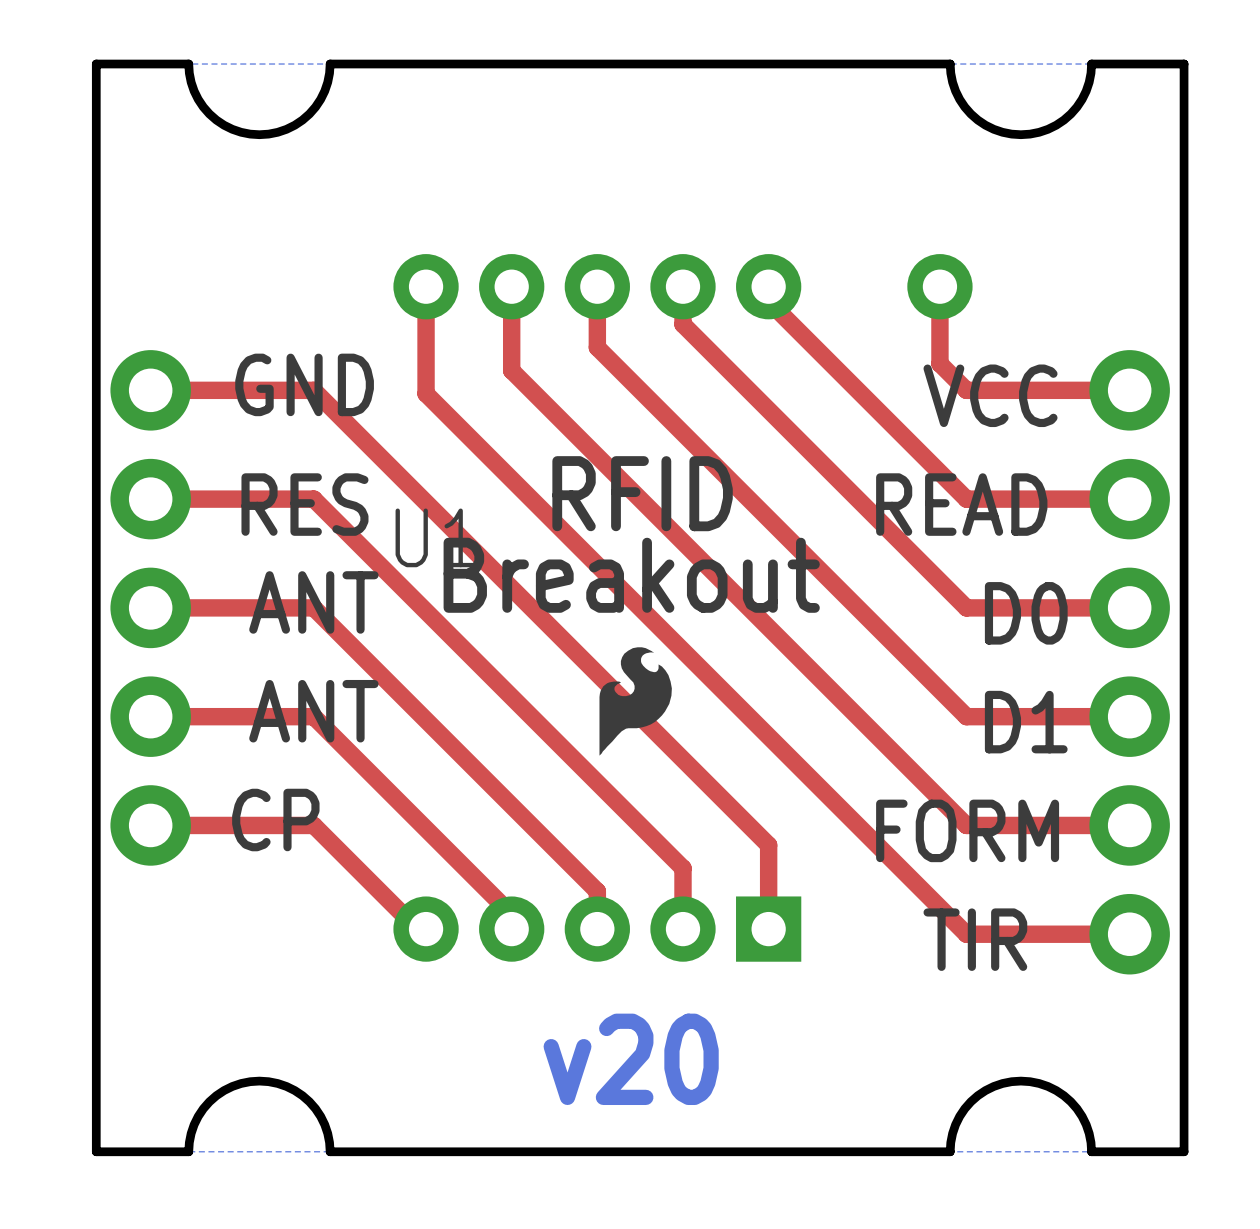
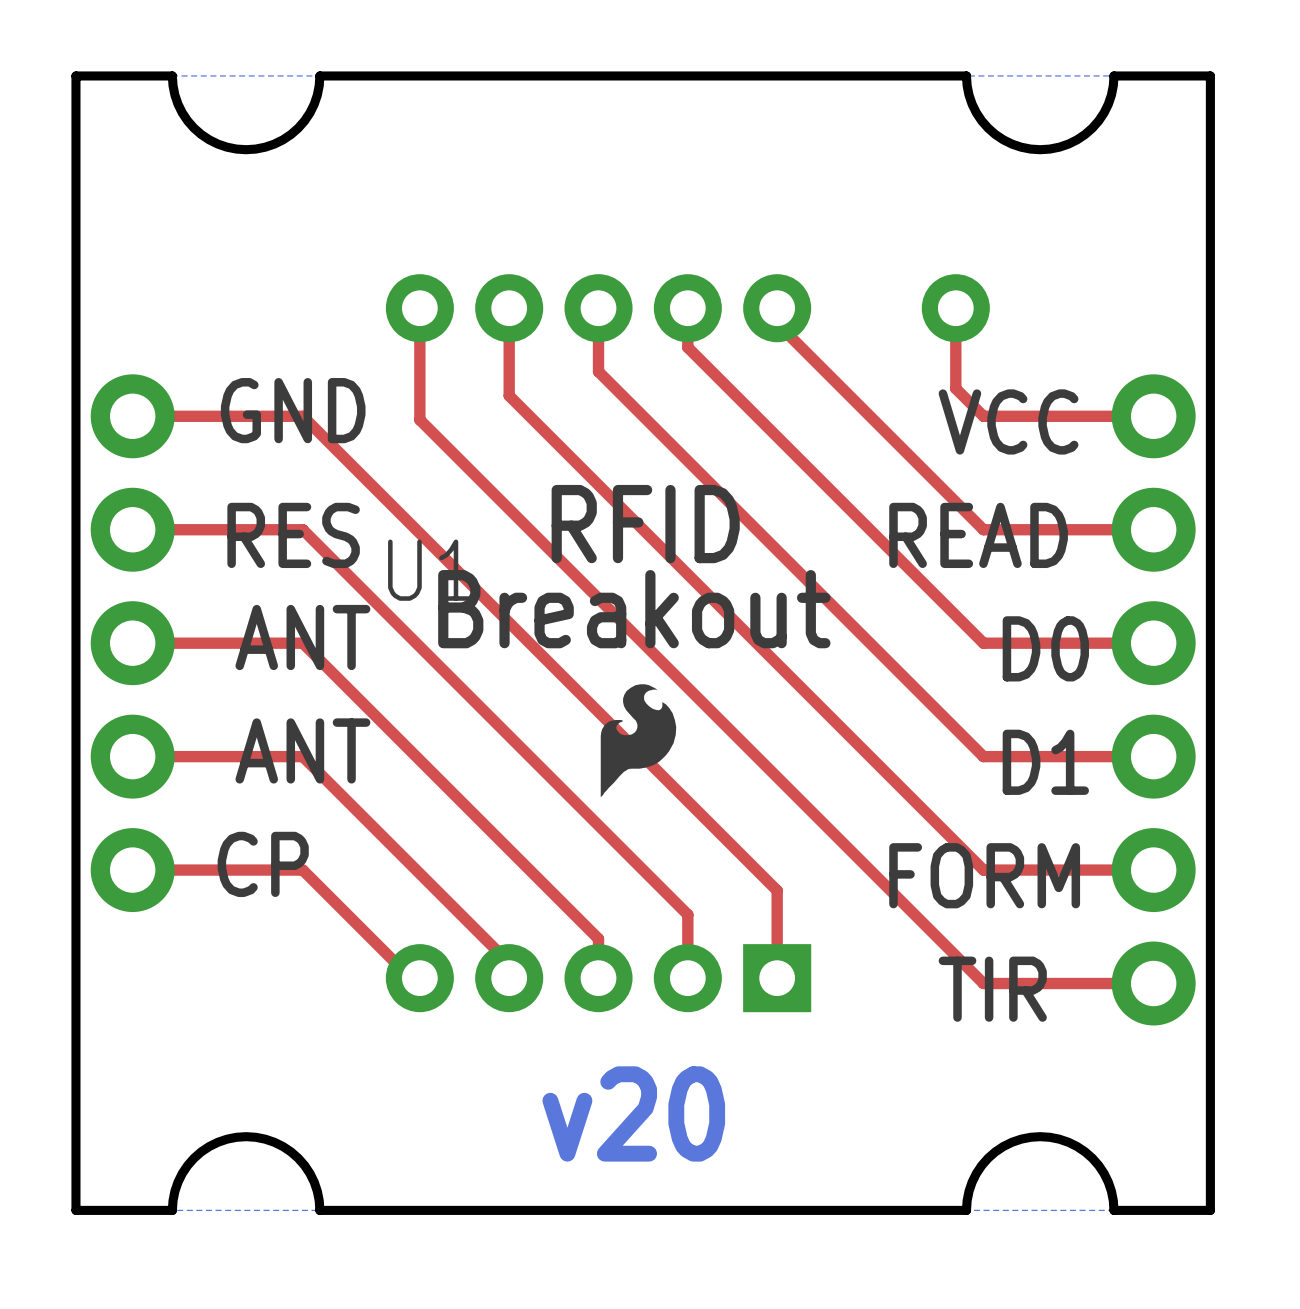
top track width: thick (426, 286) (426, 393) (966, 934) (1129, 934) -> thin (419, 308) (419, 419) (983, 983) (1153, 983)
top track width: thick (511, 286) (511, 370) (966, 825) (1129, 825) -> thin (509, 308) (509, 395) (983, 870) (1153, 870)
top track width: thick (597, 286) (597, 347) (966, 716) (1129, 716) -> thin (598, 308) (598, 371) (983, 756) (1153, 756)
top track width: thick (683, 286) (683, 324) (966, 607) (1129, 607) -> thin (687, 308) (687, 347) (983, 643) (1153, 643)
top track width: thick (768, 286) (768, 301) (966, 499) (1129, 499) -> thin (777, 308) (777, 323) (983, 529) (1153, 529)
top track width: thick (939, 286) (939, 363) (966, 390) (1129, 390) -> thin (955, 308) (955, 388) (983, 416) (1153, 416)
top track width: thick (150, 390) (313, 390) (768, 845) (768, 929) -> thin (132, 416) (302, 416) (777, 890) (777, 978)
top track width: thick (150, 499) (313, 499) (683, 868) (683, 929) -> thin (132, 529) (302, 529) (687, 914) (687, 978)
top track width: thick (150, 607) (313, 607) (597, 891) (597, 929) -> thin (132, 643) (302, 643) (598, 938) (598, 978)
top track width: thick (150, 716) (313, 716) (511, 914) (511, 929) -> thin (132, 756) (302, 756) (509, 962) (509, 978)
top track width: thick (150, 825) (313, 825) (417, 929) (426, 929) -> thin (132, 870) (302, 870) (410, 978) (419, 978)

